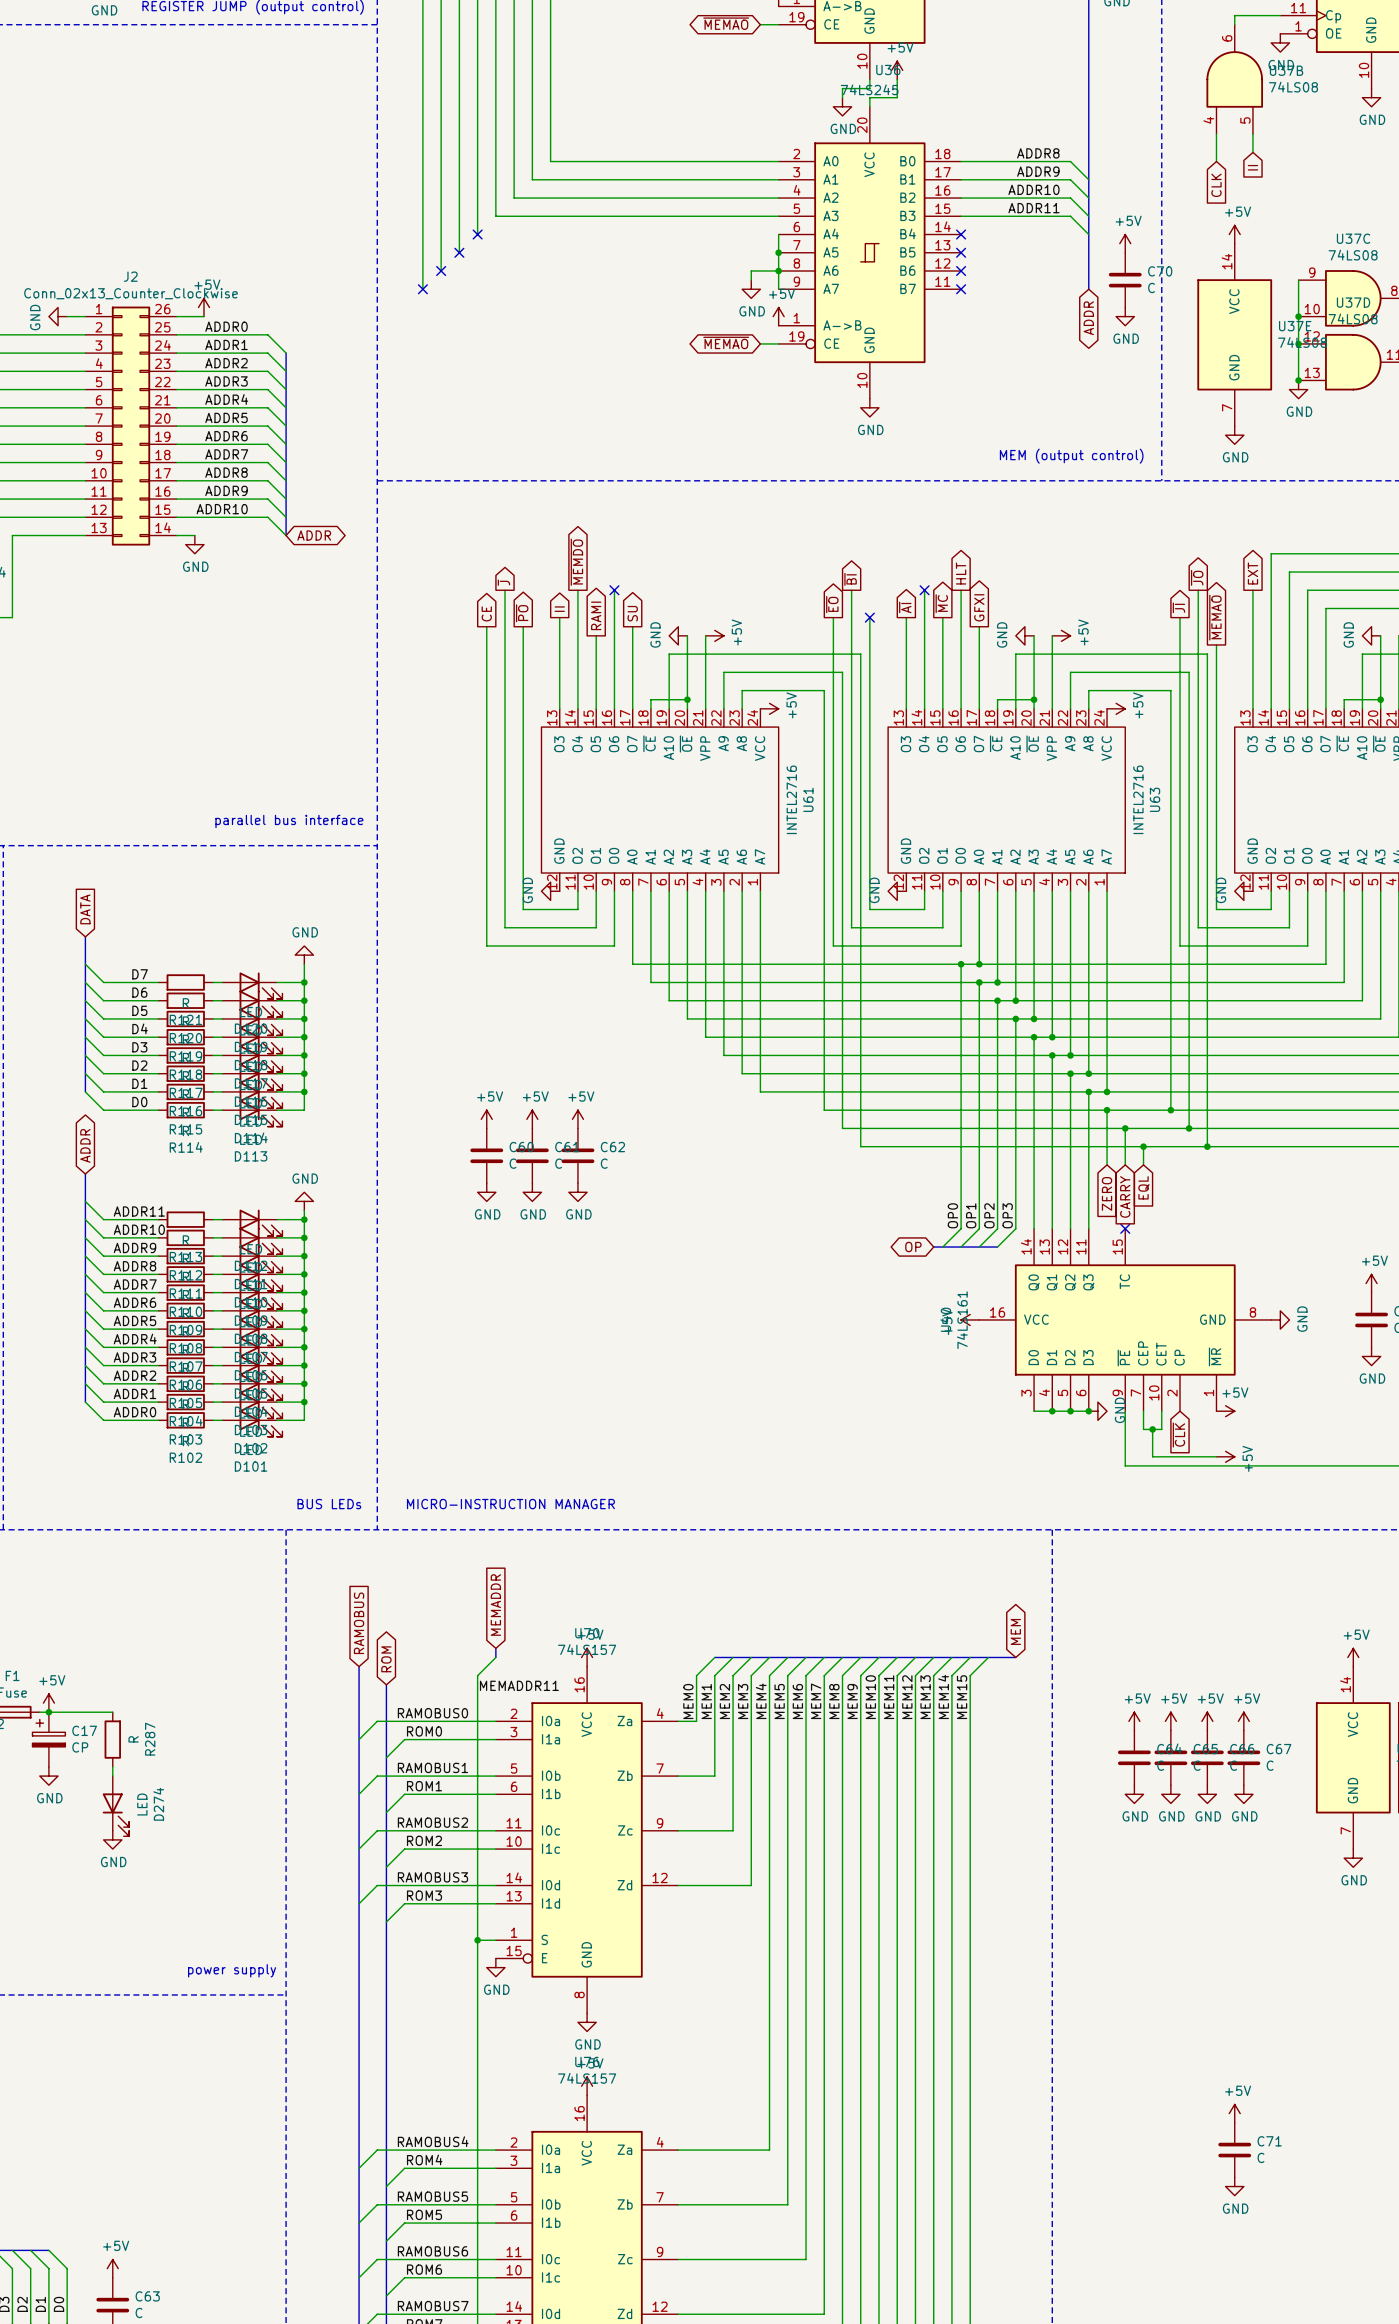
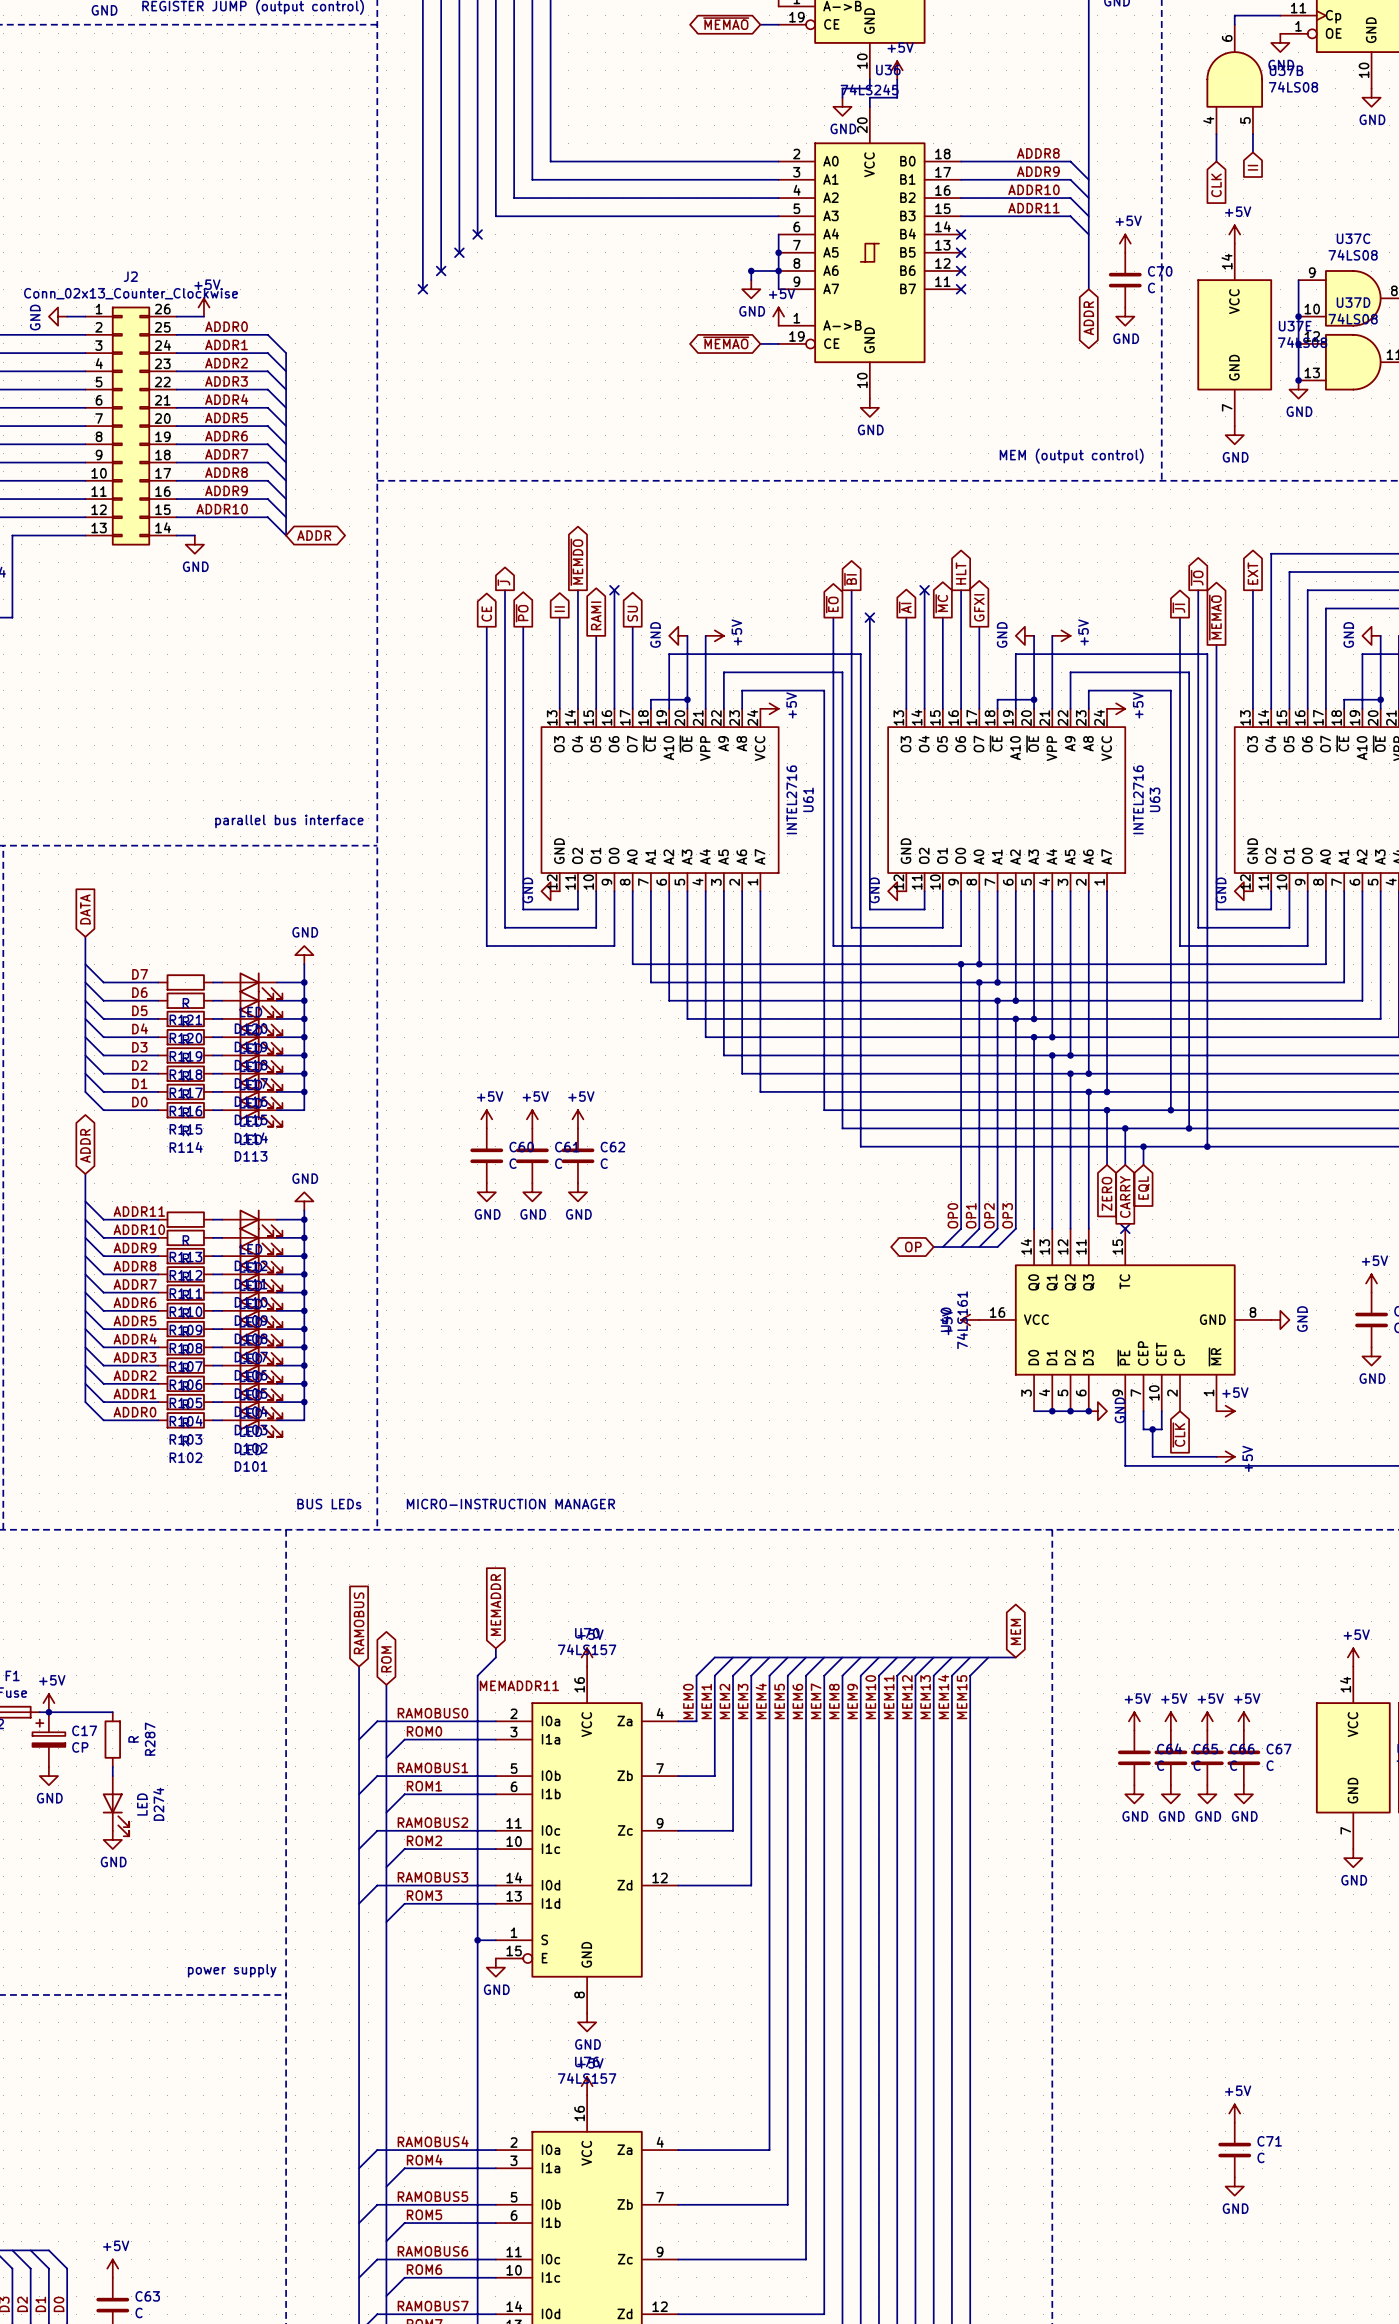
junction: none -> (751, 271)

